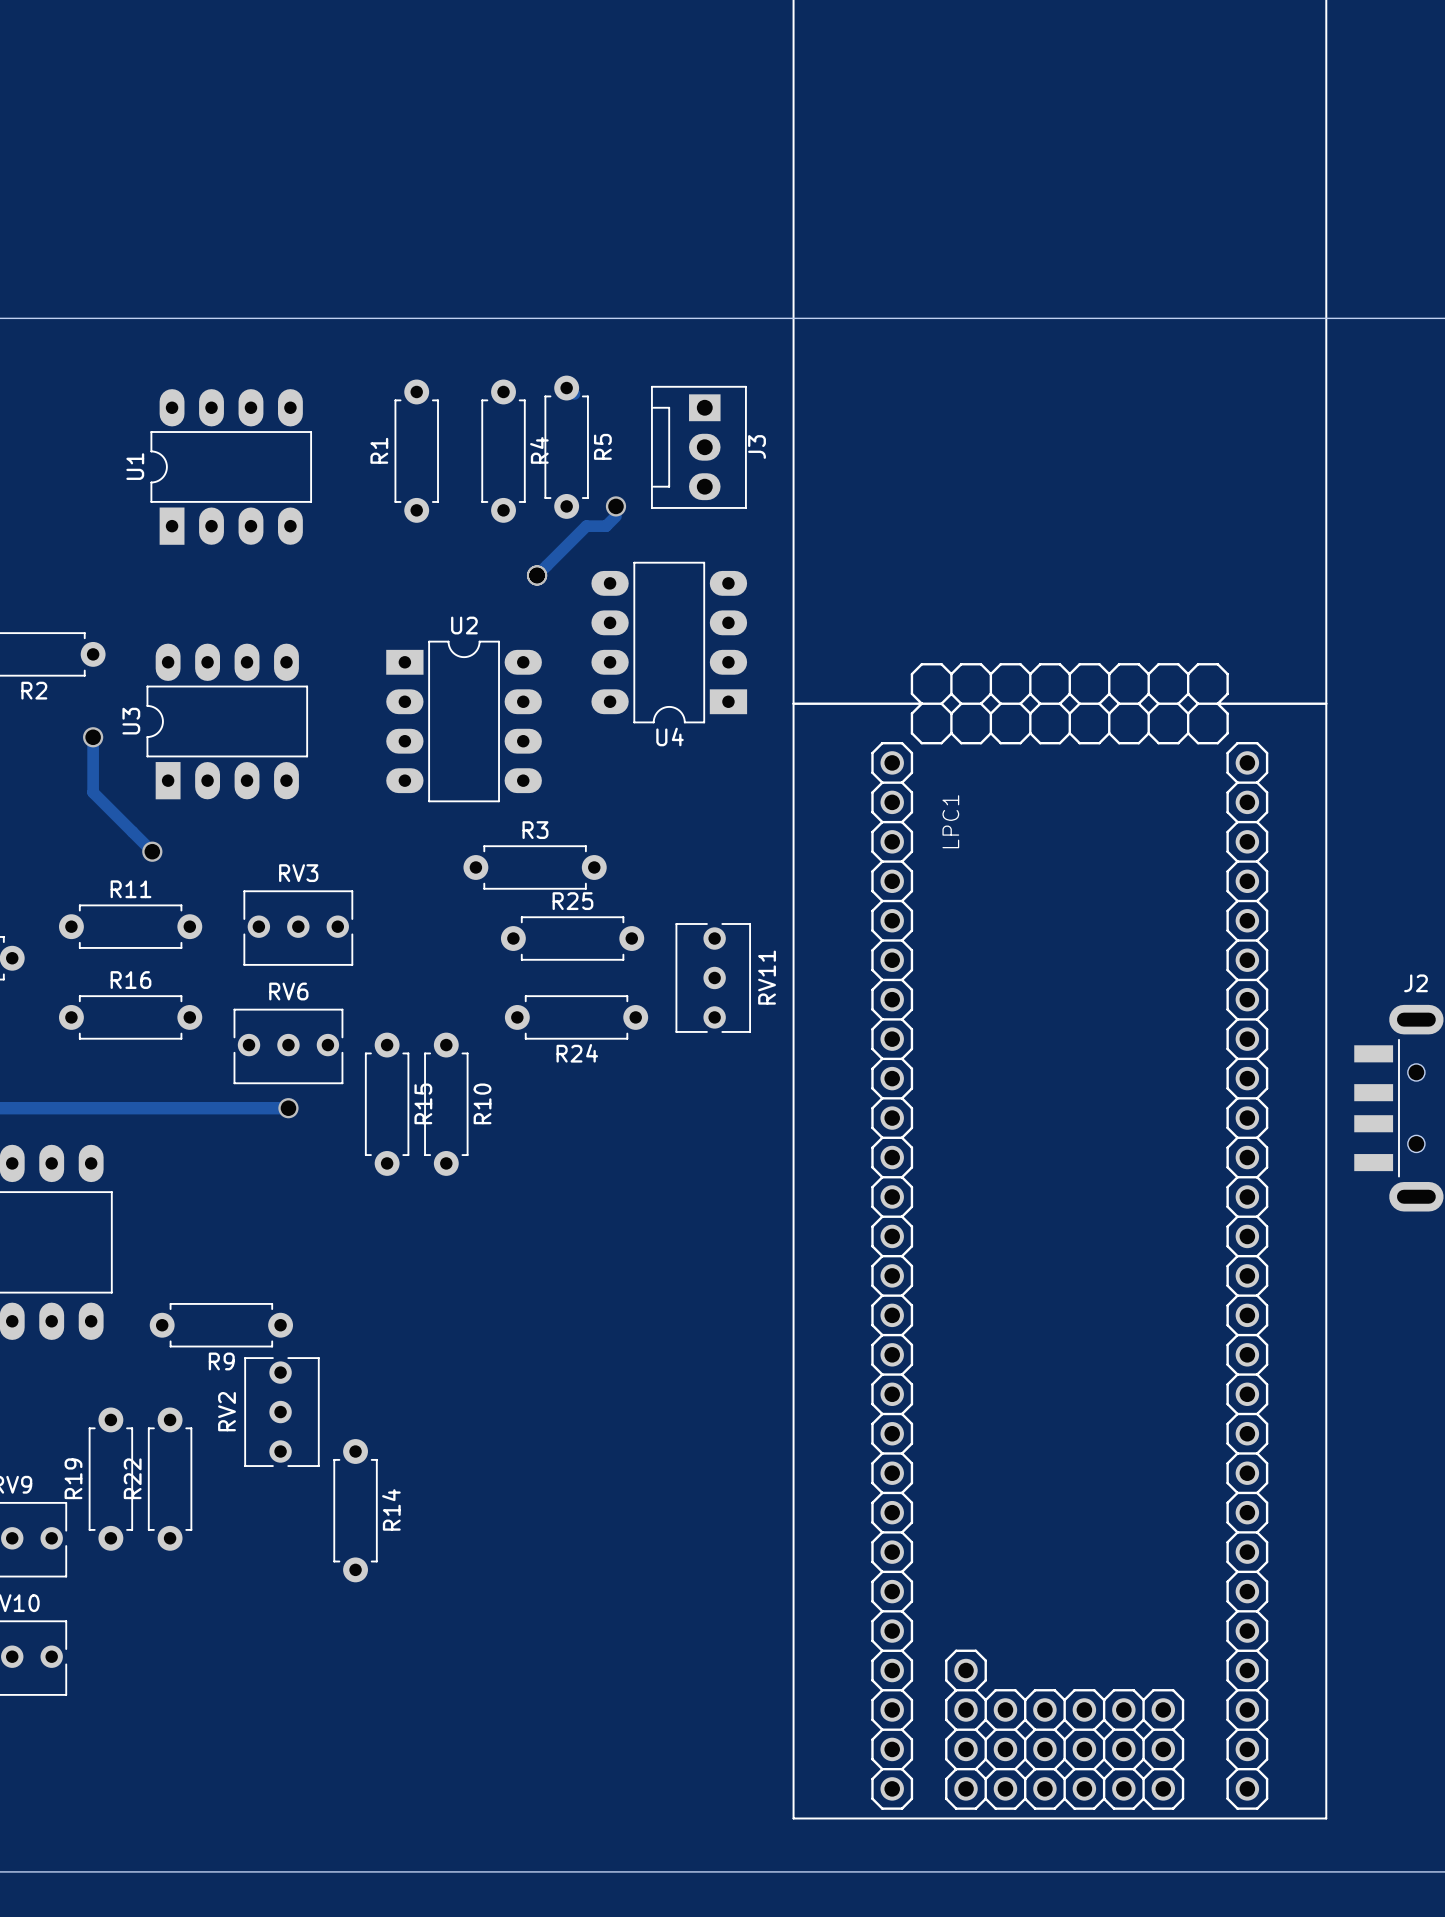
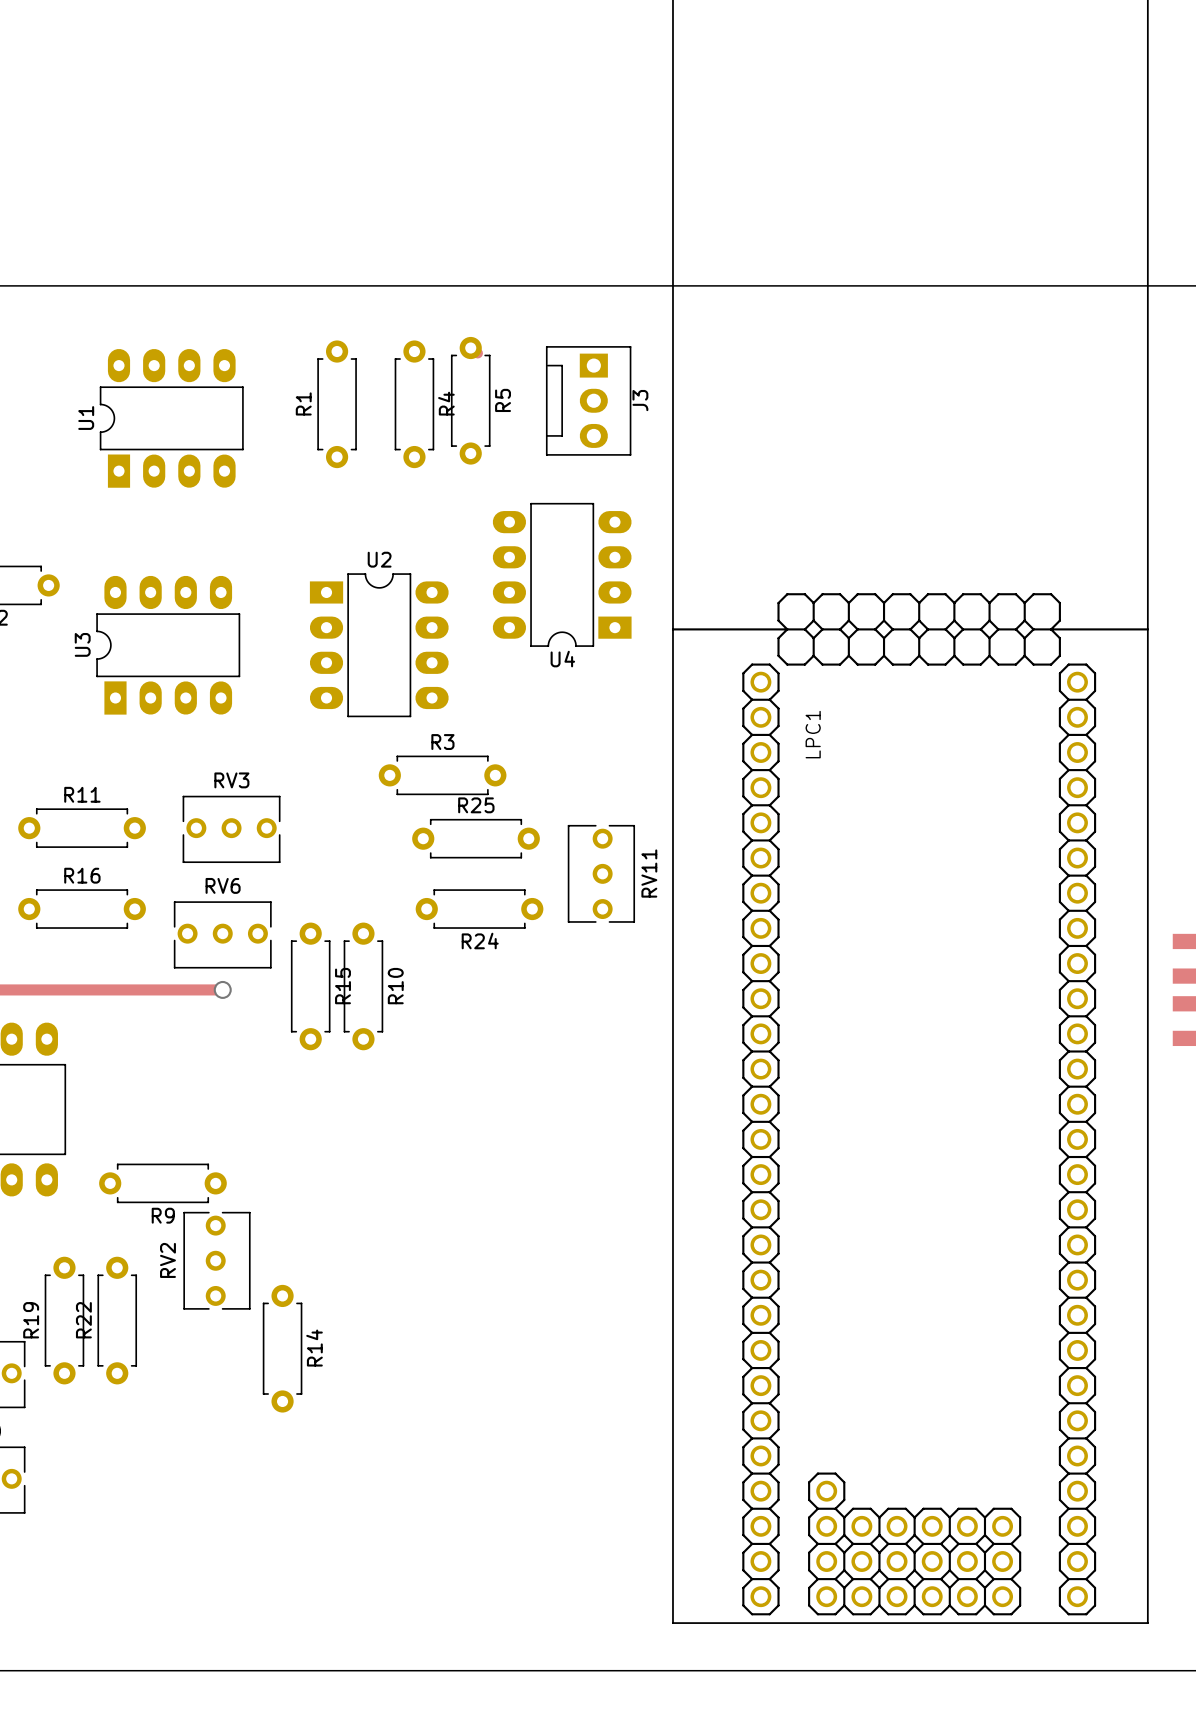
via: (615, 506) -> none
track: (615, 516) (606, 526) (586, 526) (537, 575) -> none
via: (537, 575) -> none
track: (93, 737) (93, 792) (152, 851) -> none
via: (93, 737) -> none
via: (152, 851) -> none

